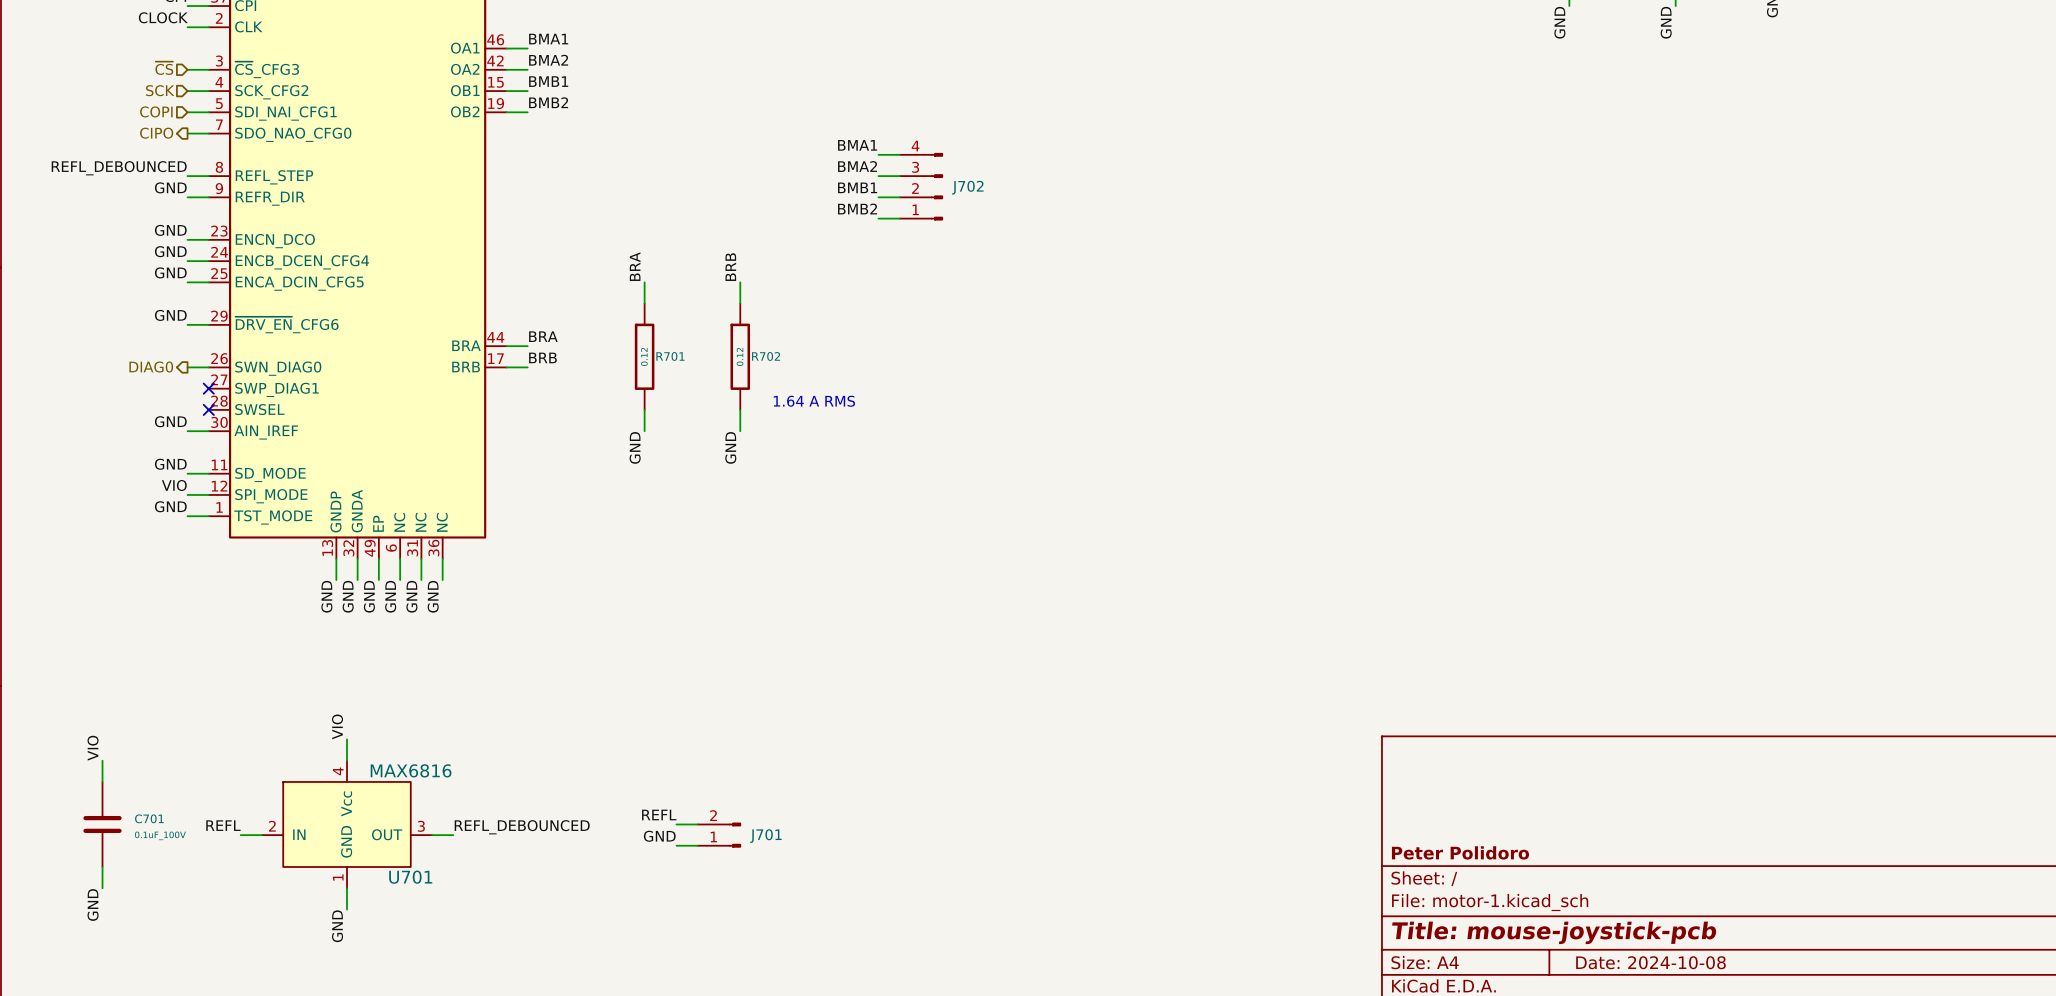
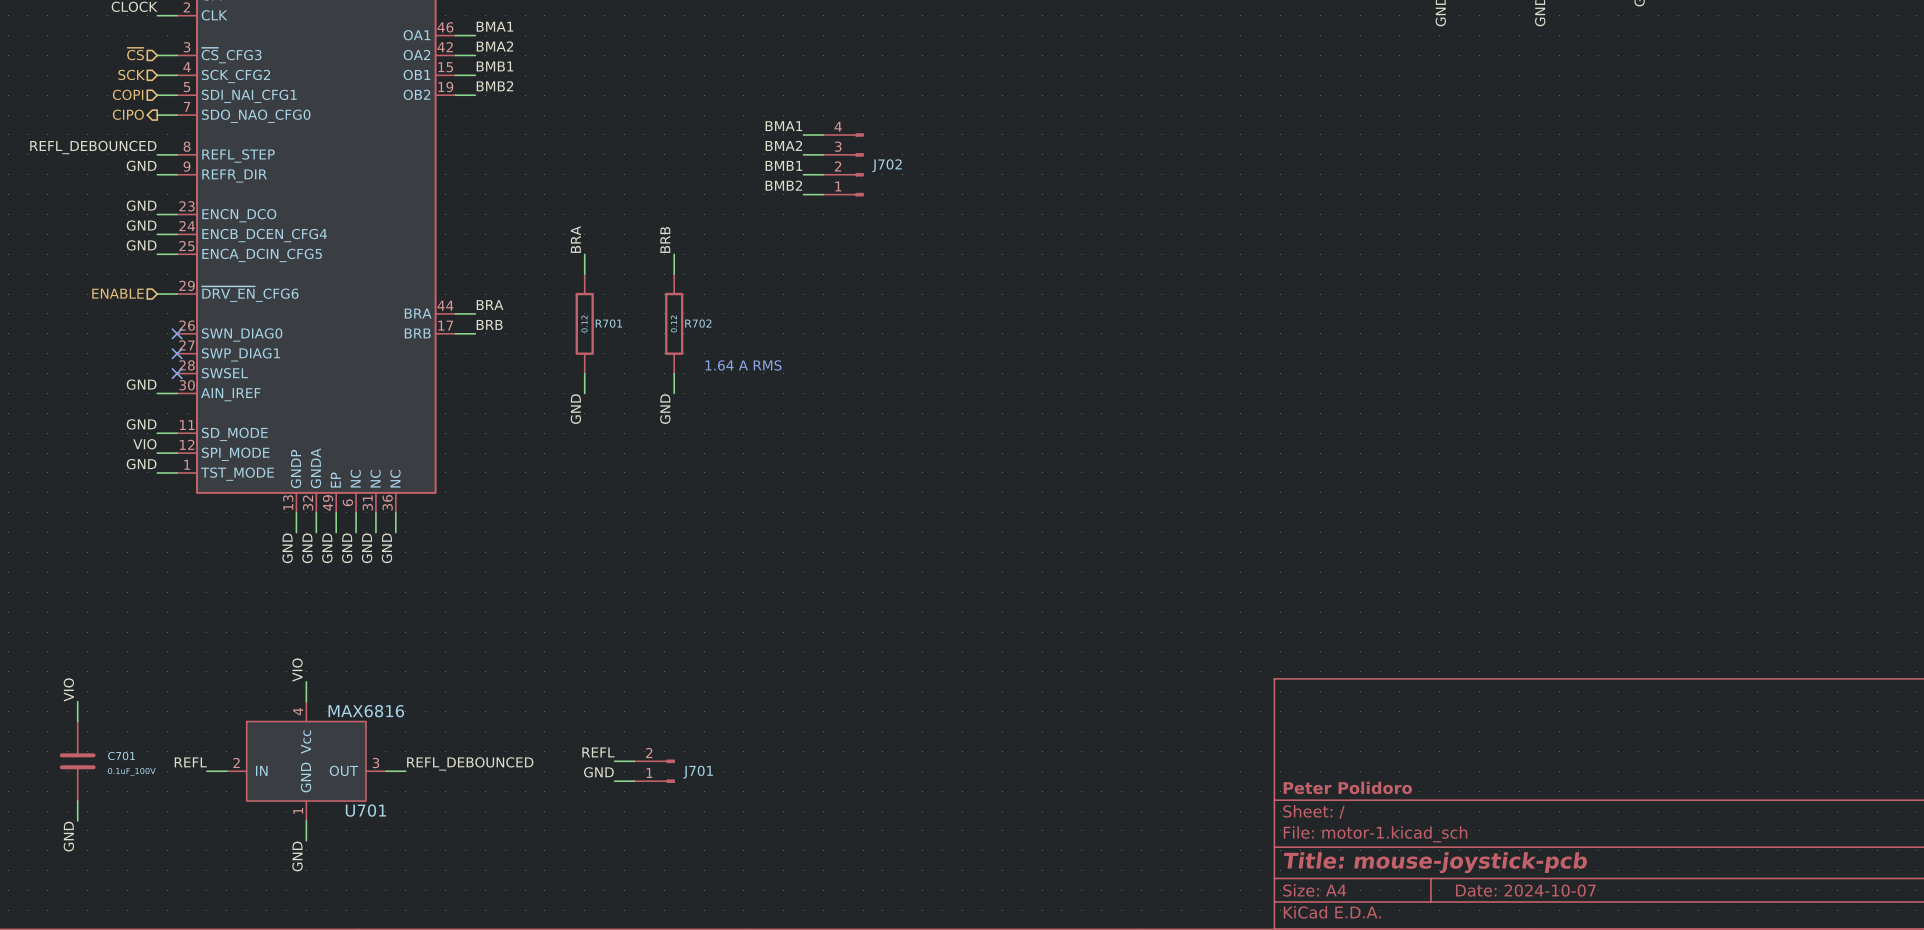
label: GND (170, 315) -> none
hierarchical label: none -> ENABLE (117, 293)
hierarchical label: DIAG0 (151, 367) -> none
wire: (187, 367) (208, 367) -> none
no-connect mark: none -> (177, 333)
title block: Date: 2024-10-08 (1650, 962) -> Date: 2024-10-07 (1525, 890)

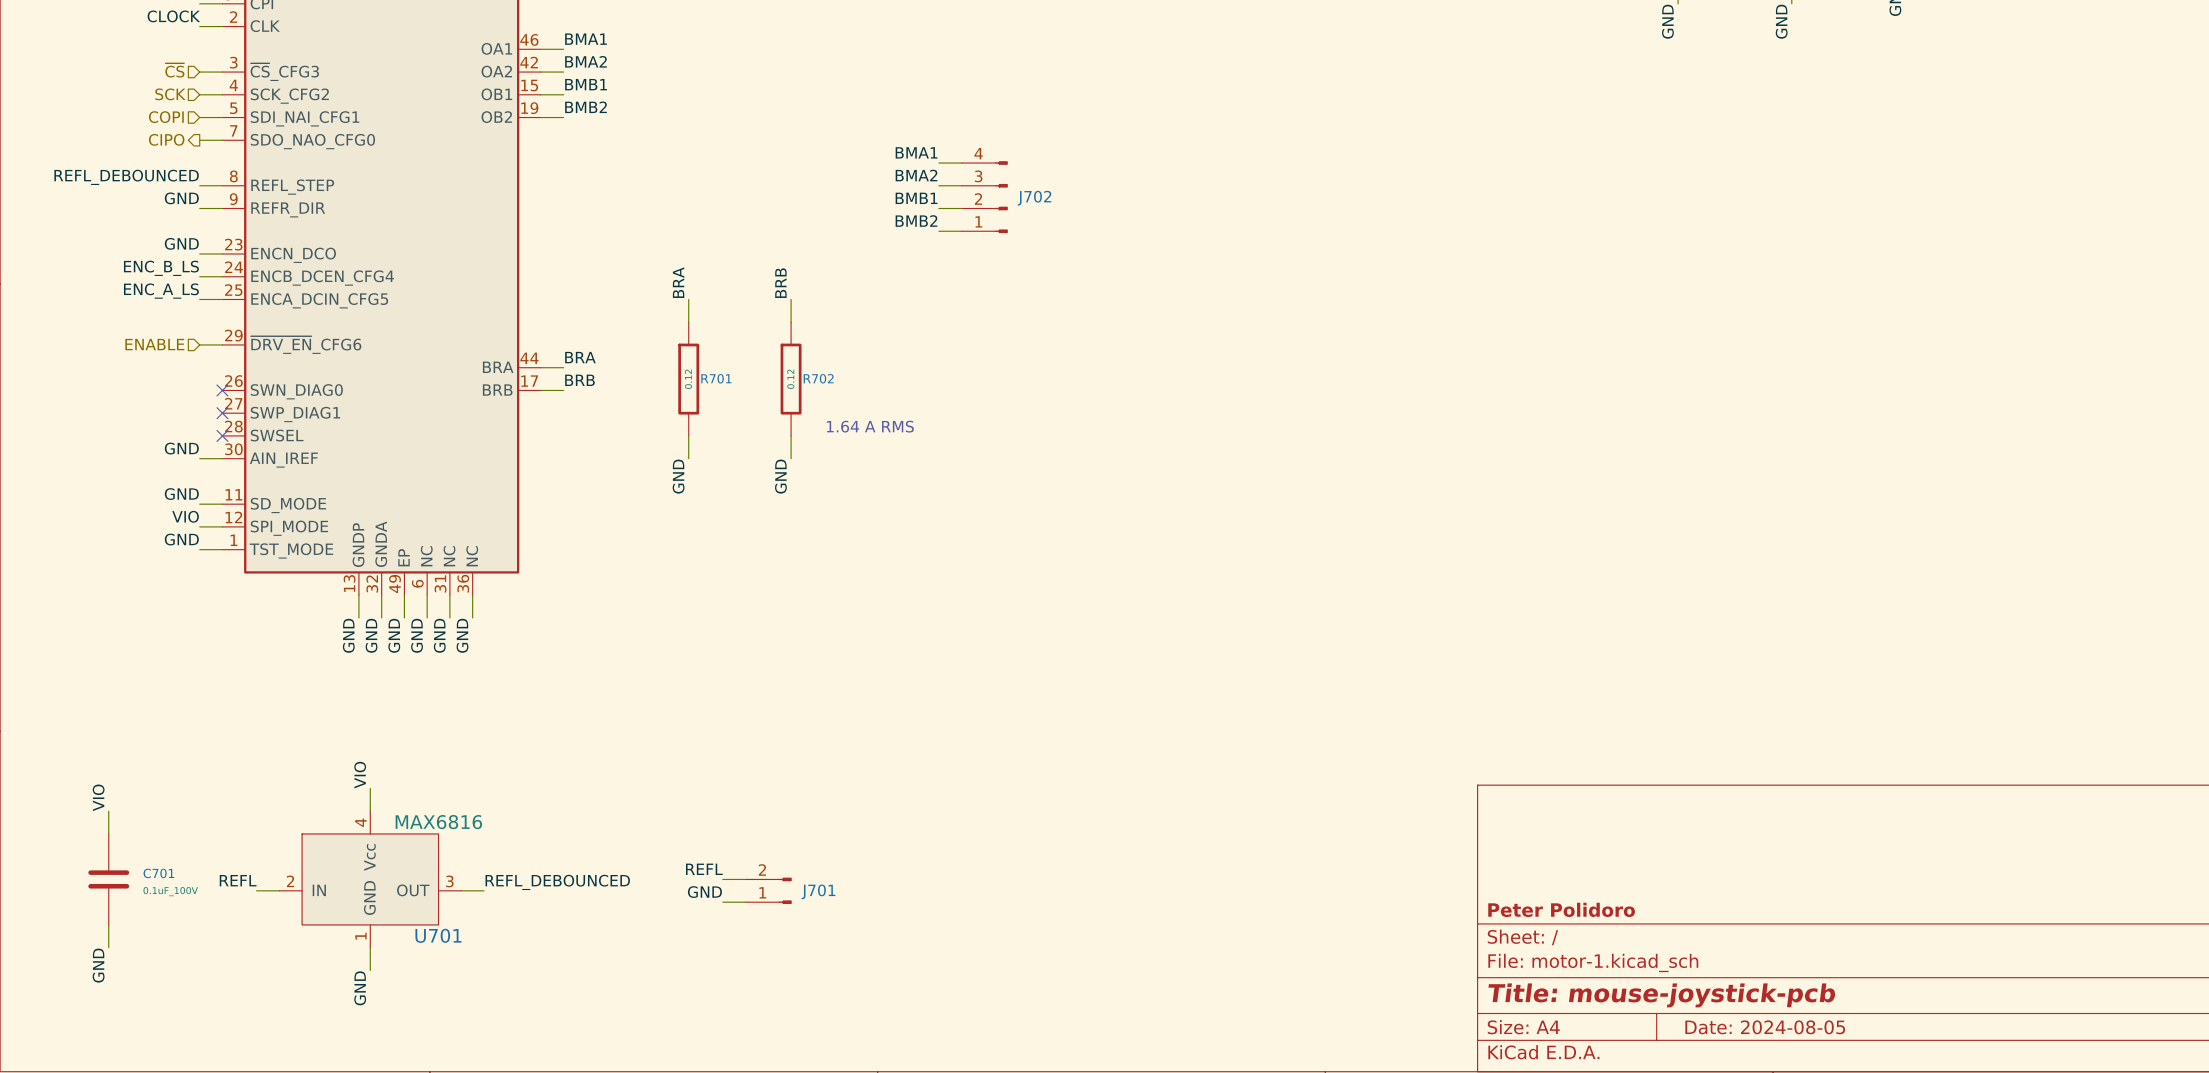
label: GND (141, 225) -> ENC_B_LS (161, 268)
label: GND (141, 245) -> ENC_A_LS (161, 291)
title block: Date: 2024-10-07 (1525, 890) -> Date: 2024-08-05 (1765, 1027)

